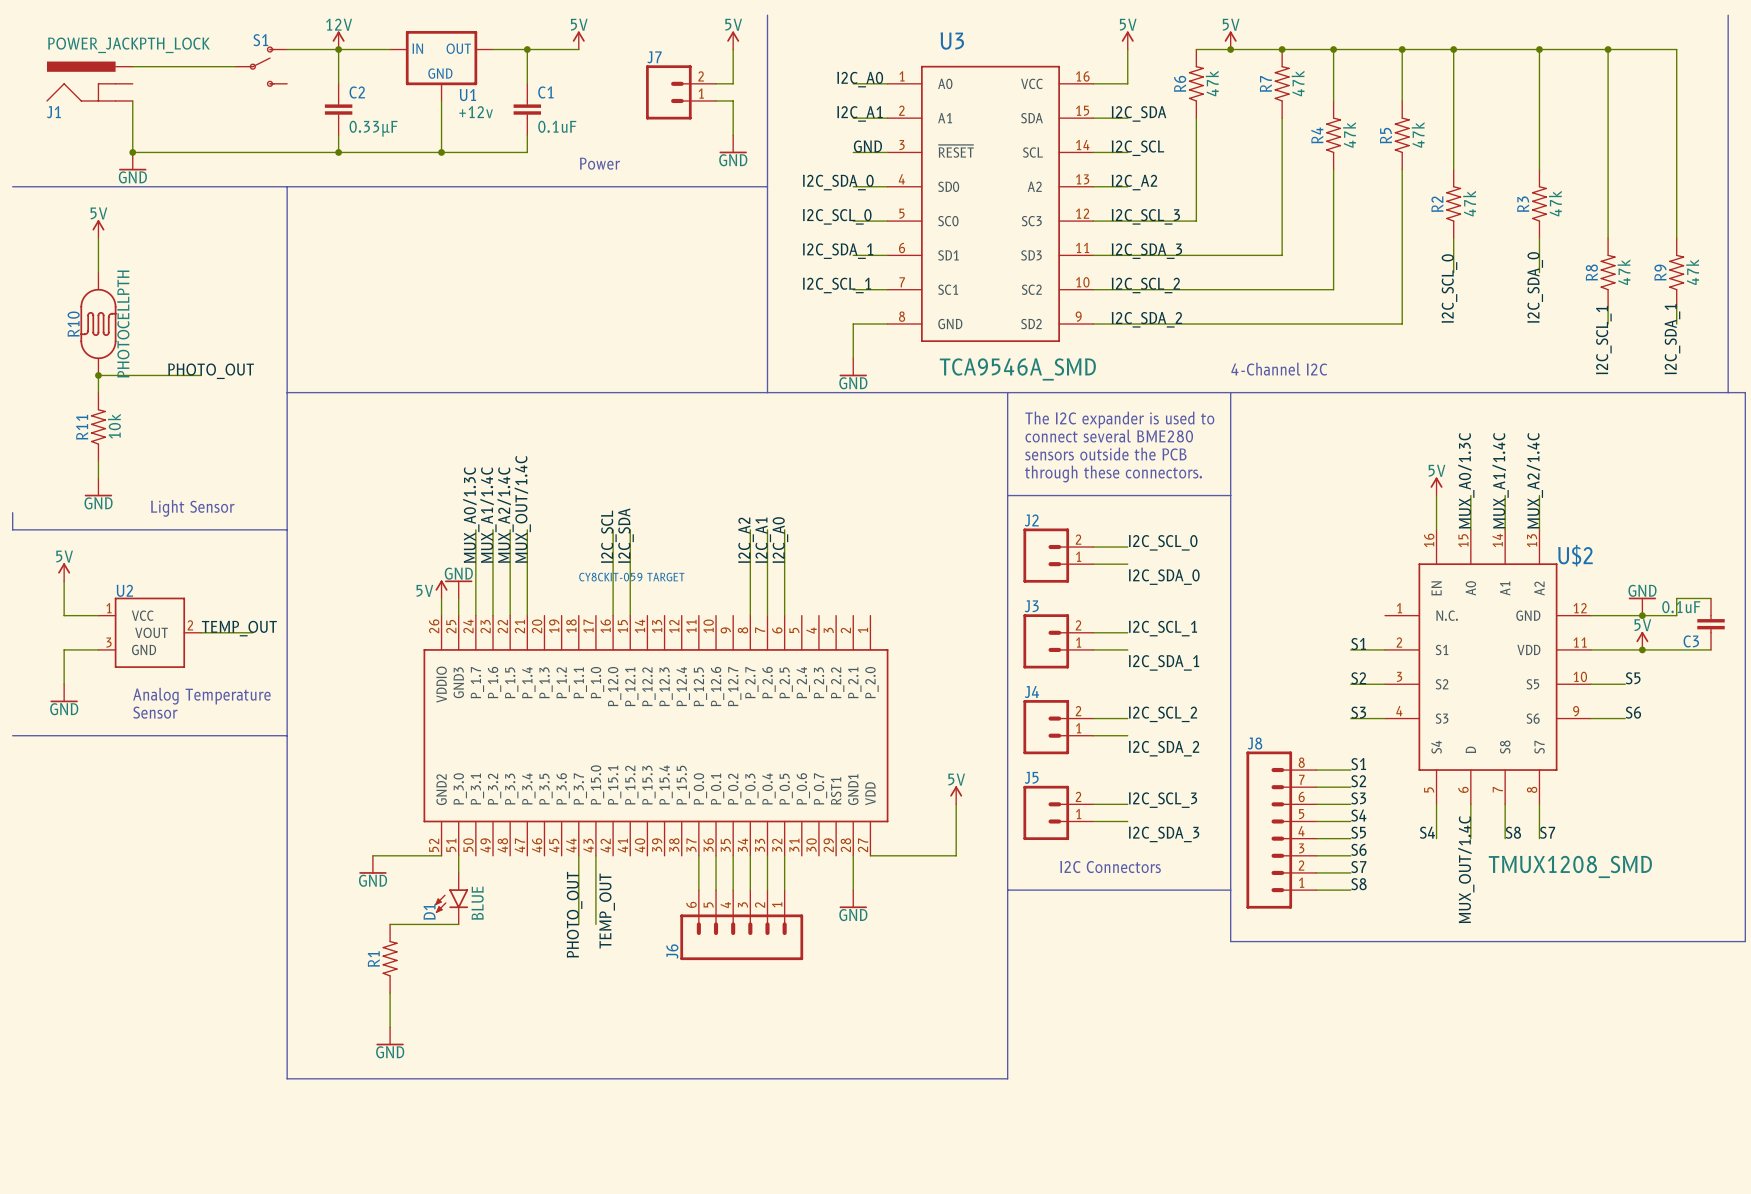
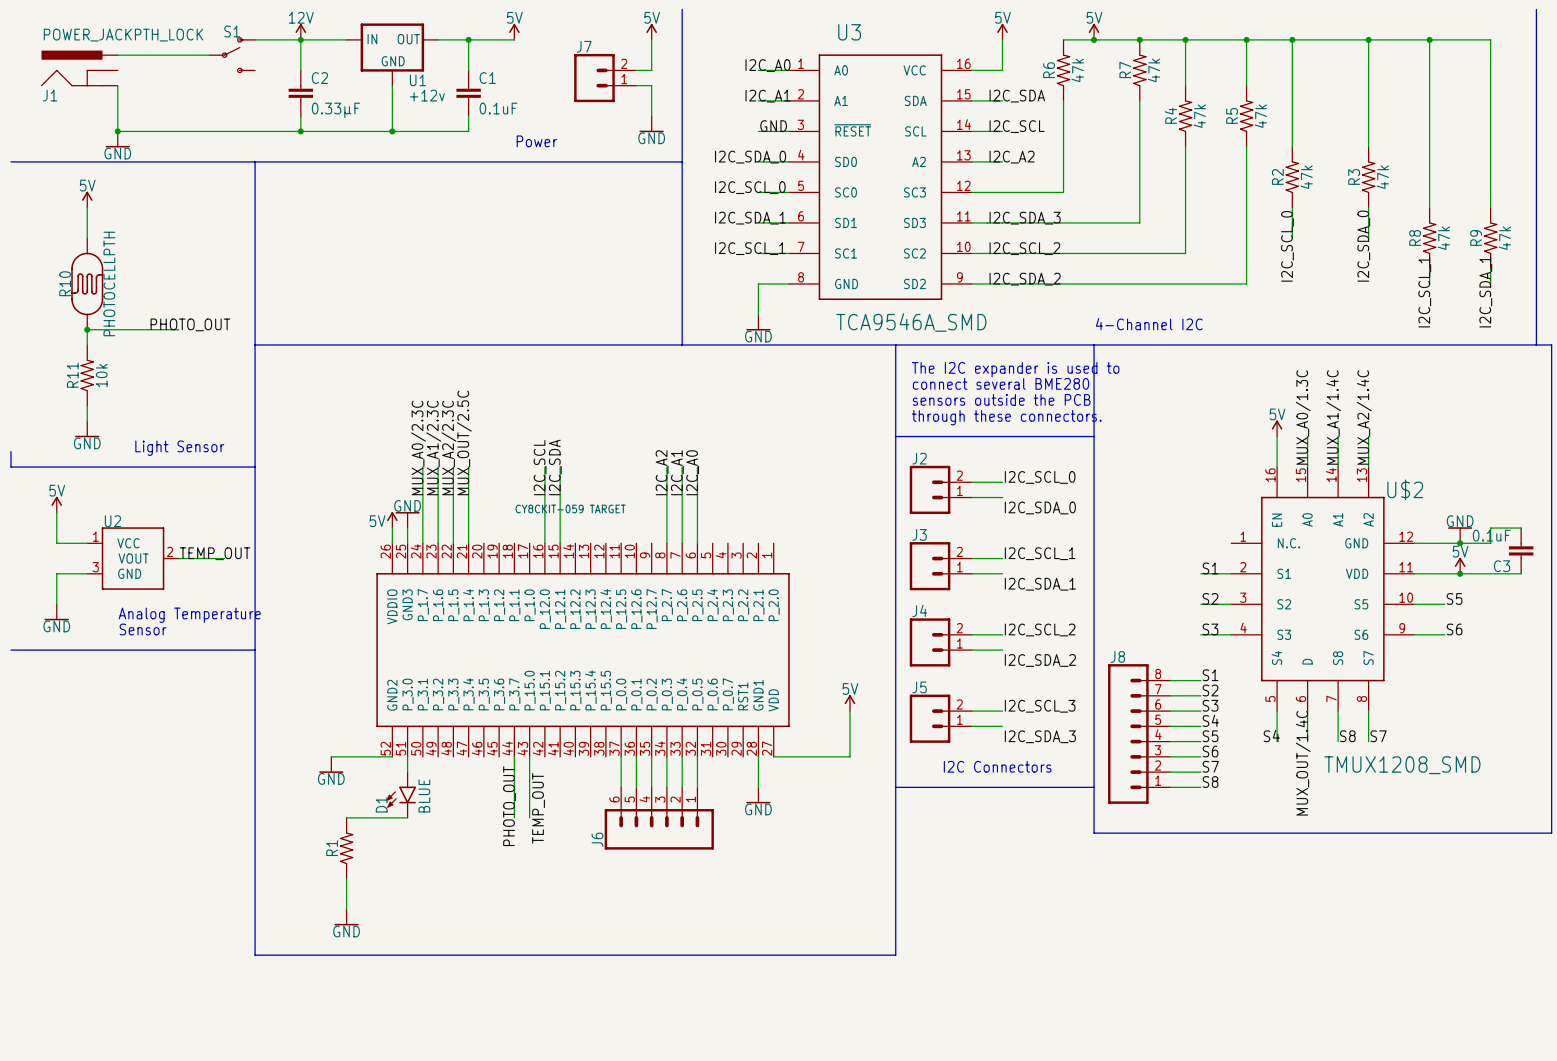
label: I2C_SCL_3 (1145, 216) -> none
label: MUX_OUT/1.4C (522, 509) -> MUX_OUT/2.5C (464, 442)
label: MUX_A0/1.3C (471, 515) -> MUX_A0/2.3C (418, 448)
label: MUX_A1/1.4C (488, 515) -> MUX_A1/2.3C (433, 448)
label: MUX_A2/1.4C (505, 515) -> MUX_A2/2.3C (449, 448)

